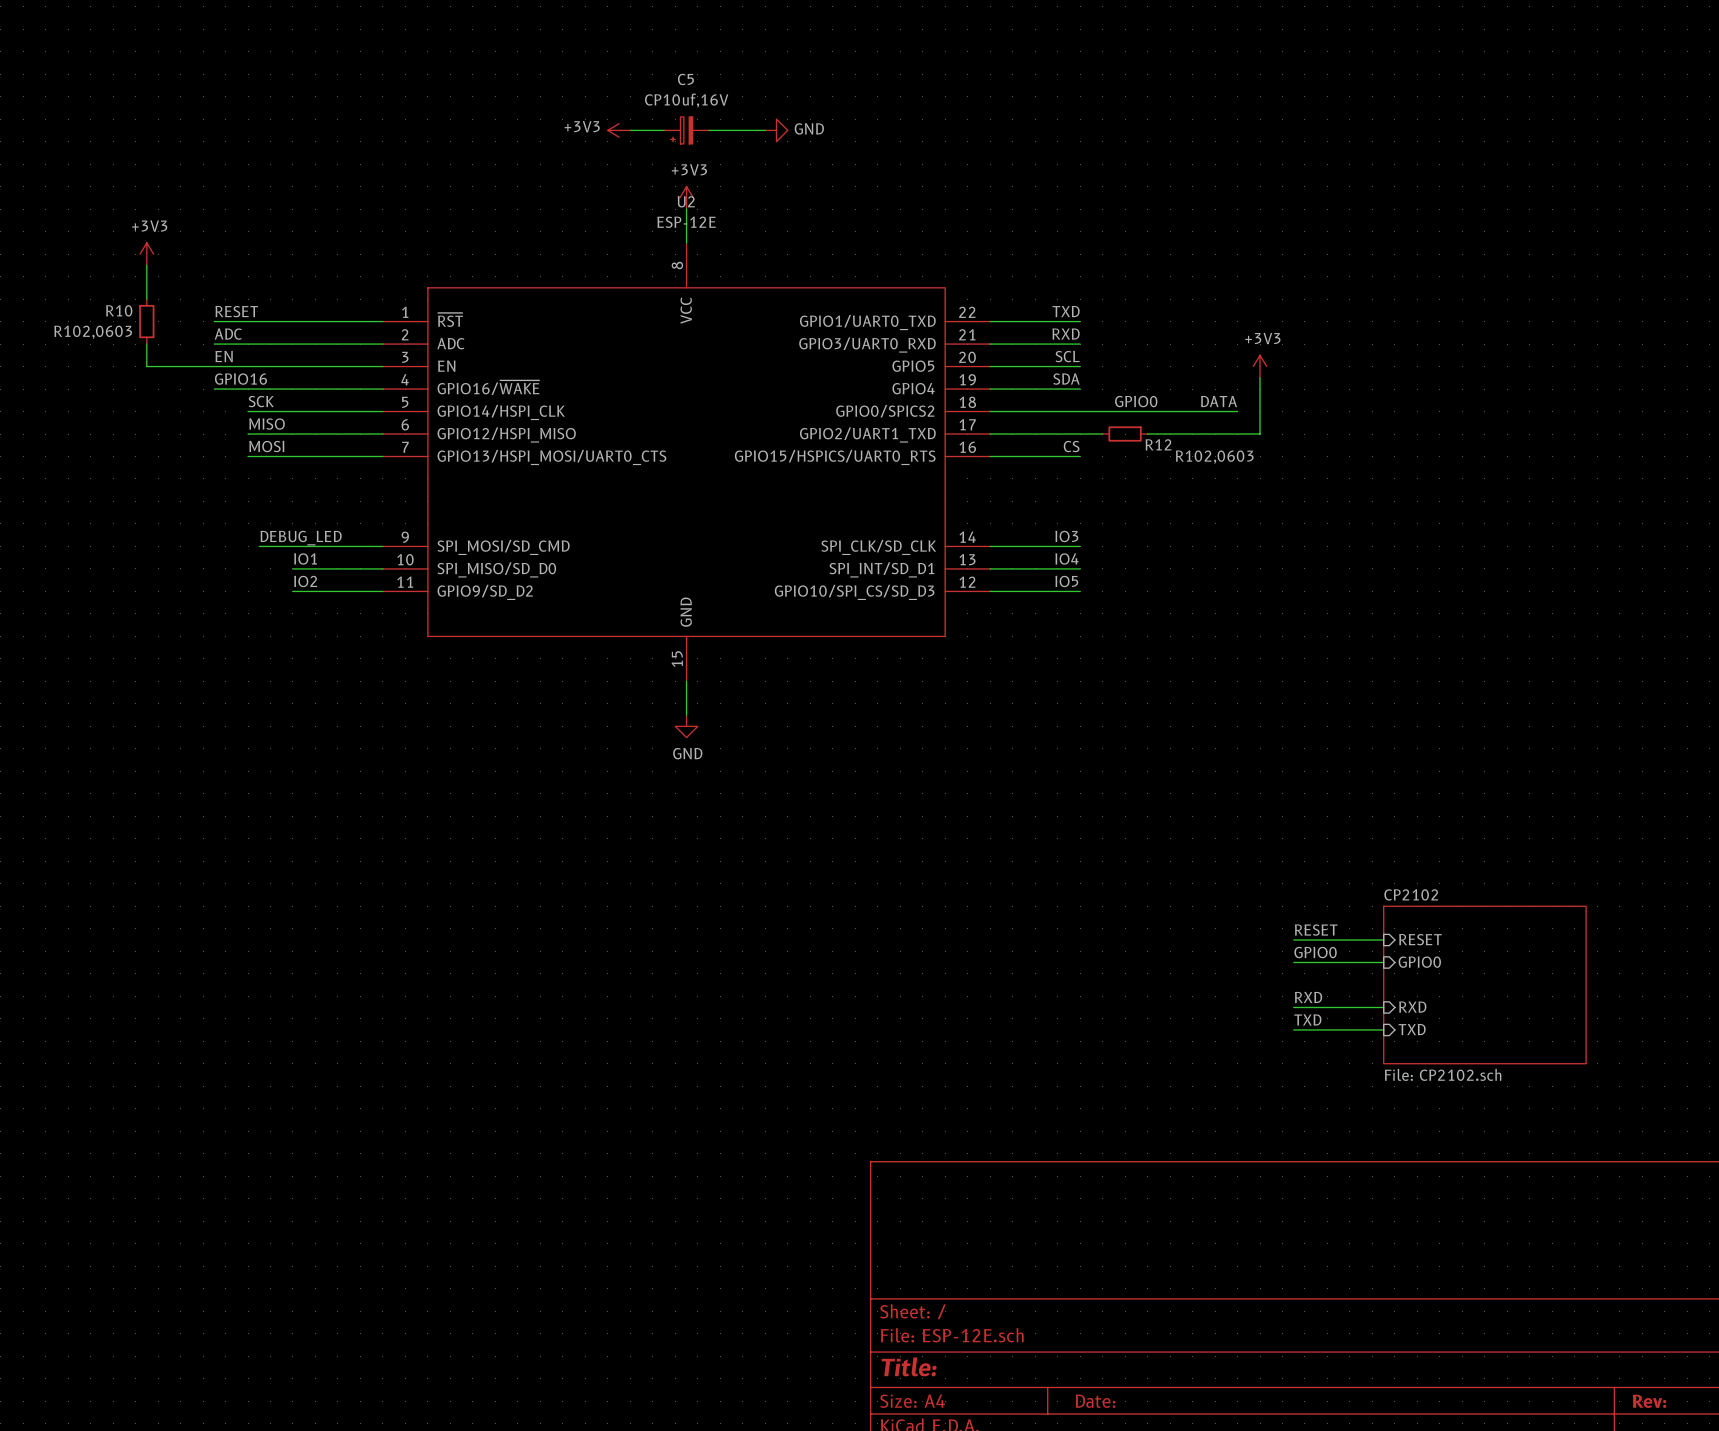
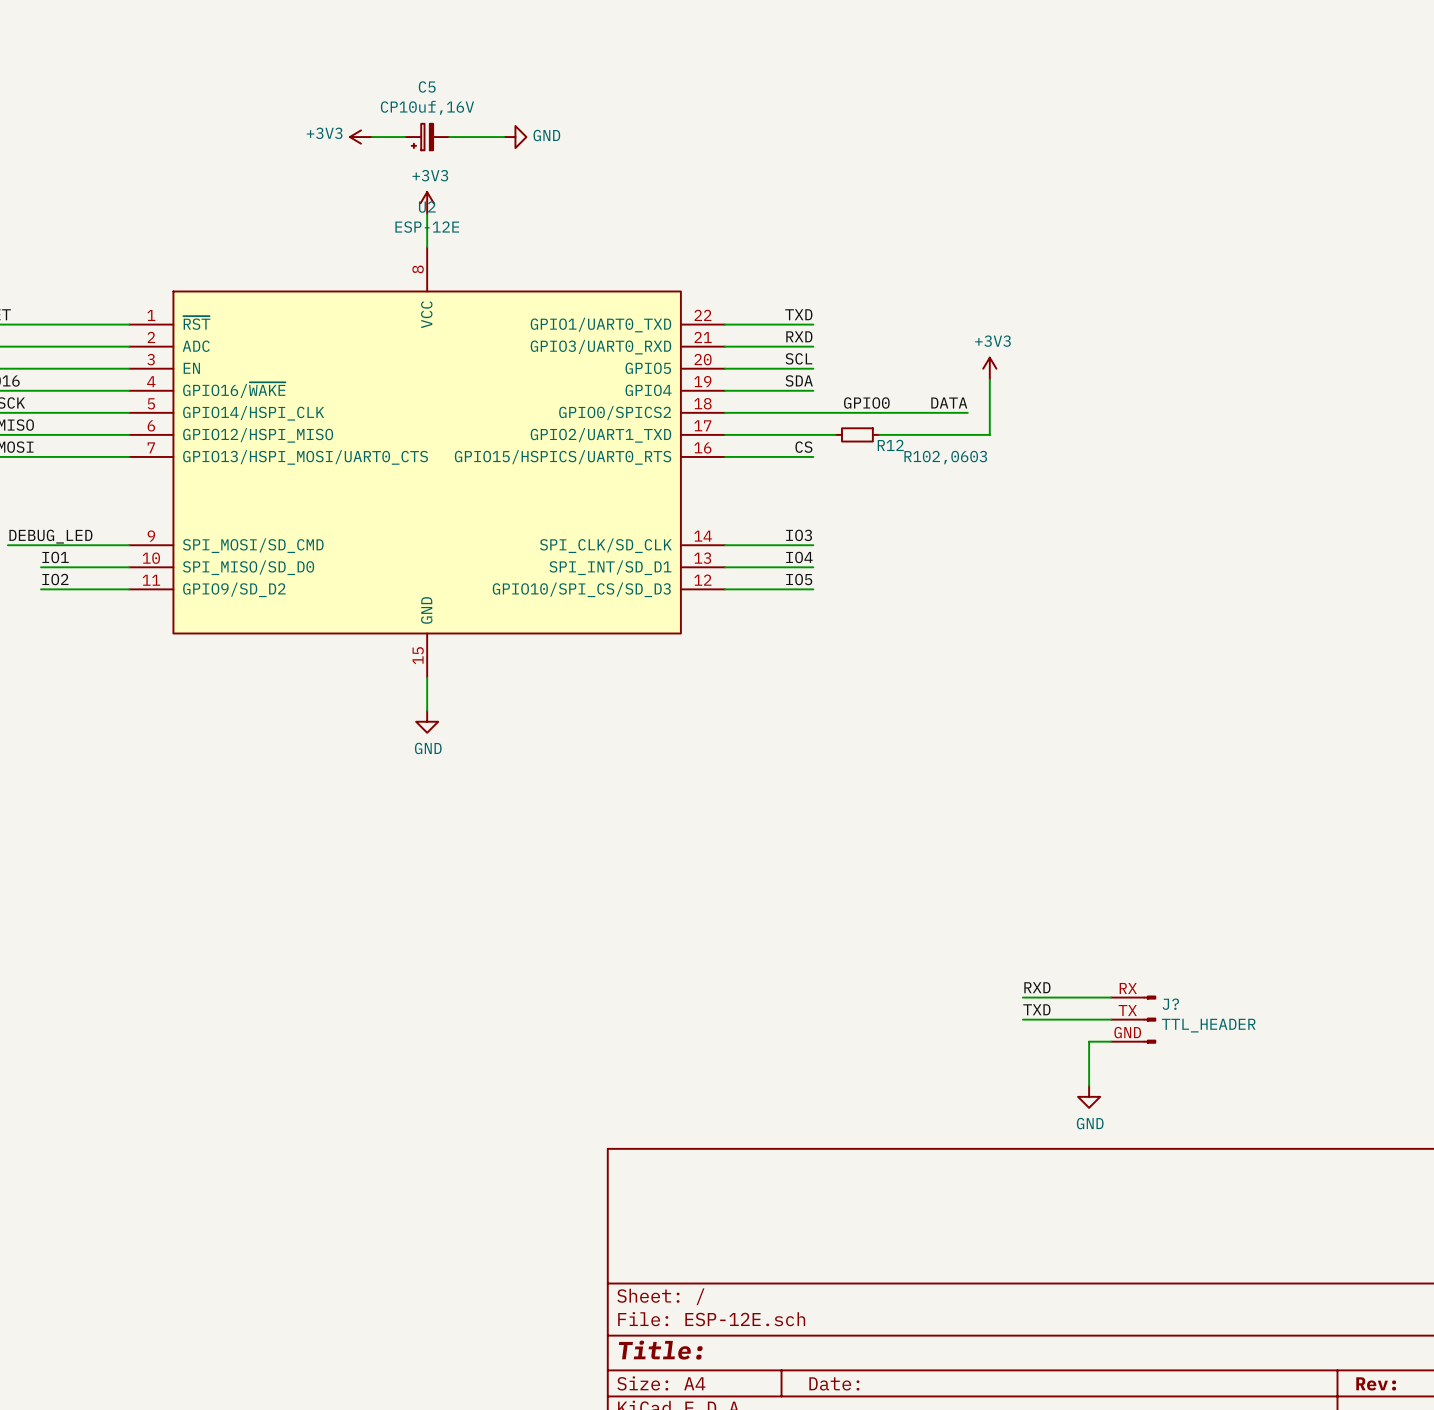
label: RESET (1316, 930) -> none
sheet pin: RESET (1420, 939) -> none
wire: (1293, 940) (1383, 940) -> none
label: GPIO0 (1315, 952) -> none
wire: (1293, 962) (1383, 962) -> none
sheet pin: GPIO0 (1419, 962) -> none
sheet CP2102: File: CP2102.sch (1484, 984) -> none
sheet pin: RXD (1412, 1007) -> none
J?: none -> TTL_HEADER (1133, 1019)
sheet pin: TXD (1412, 1029) -> none
wire: none -> (1111, 1041) (1089, 1041) (1089, 1085)
power symbol: none -> GND (1089, 1096)

